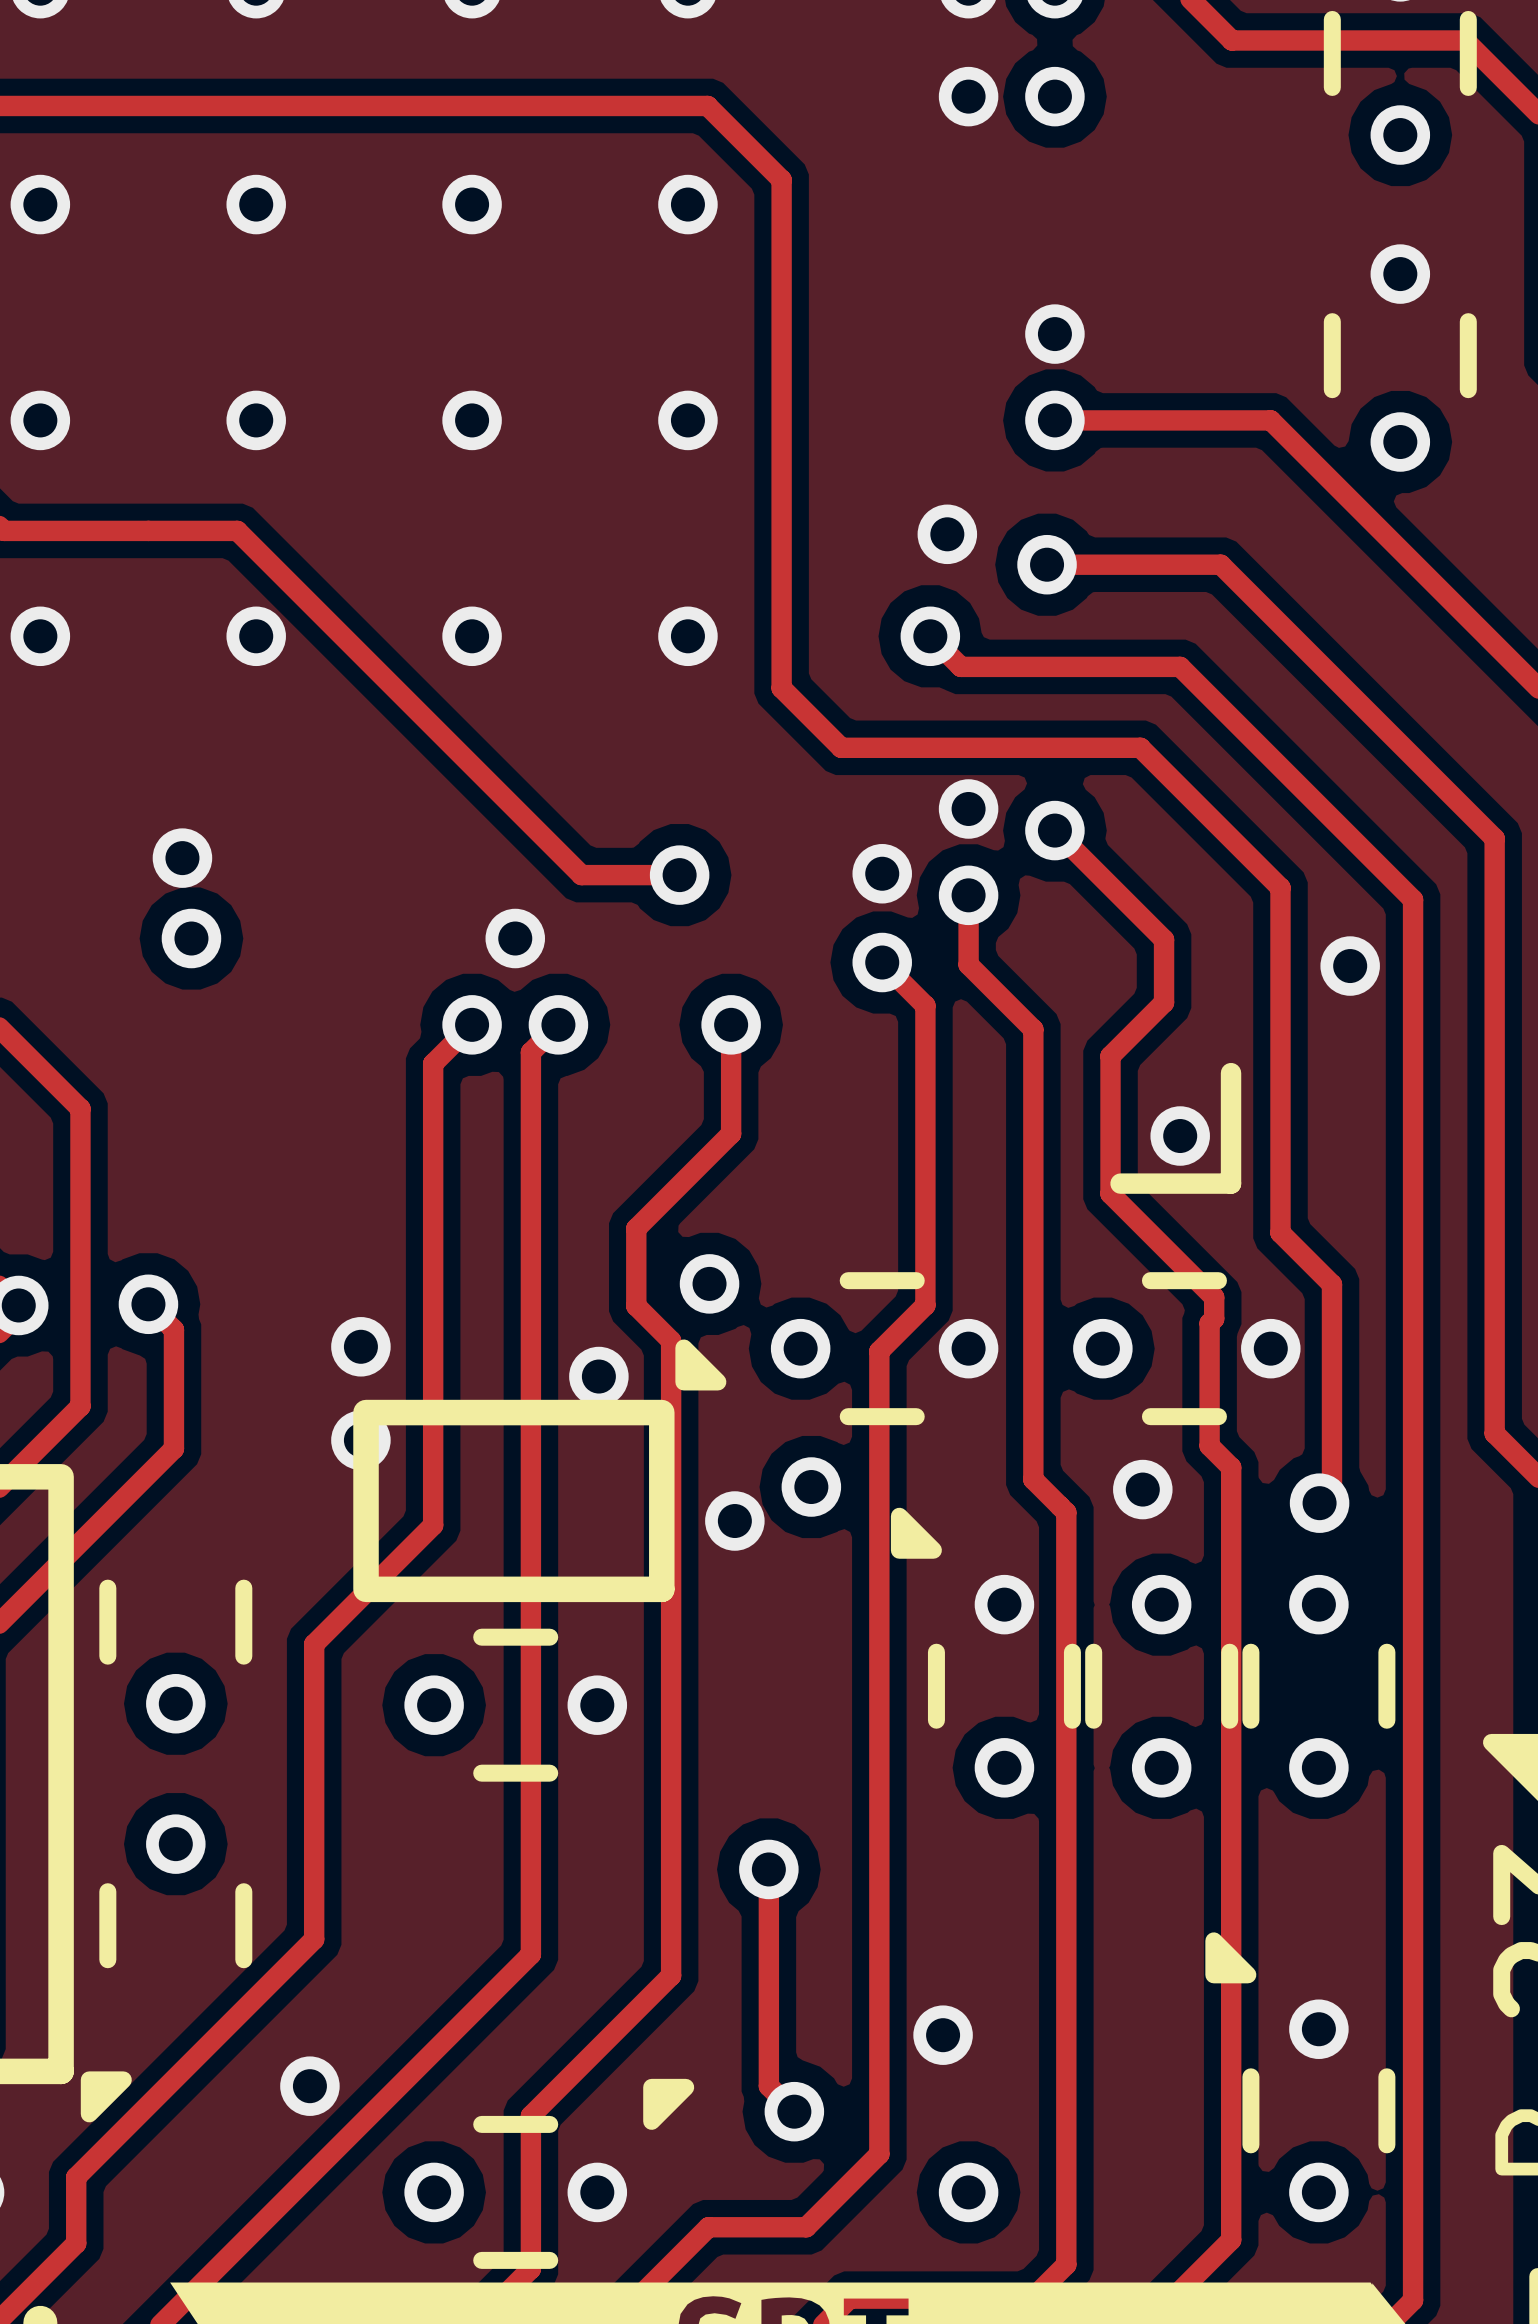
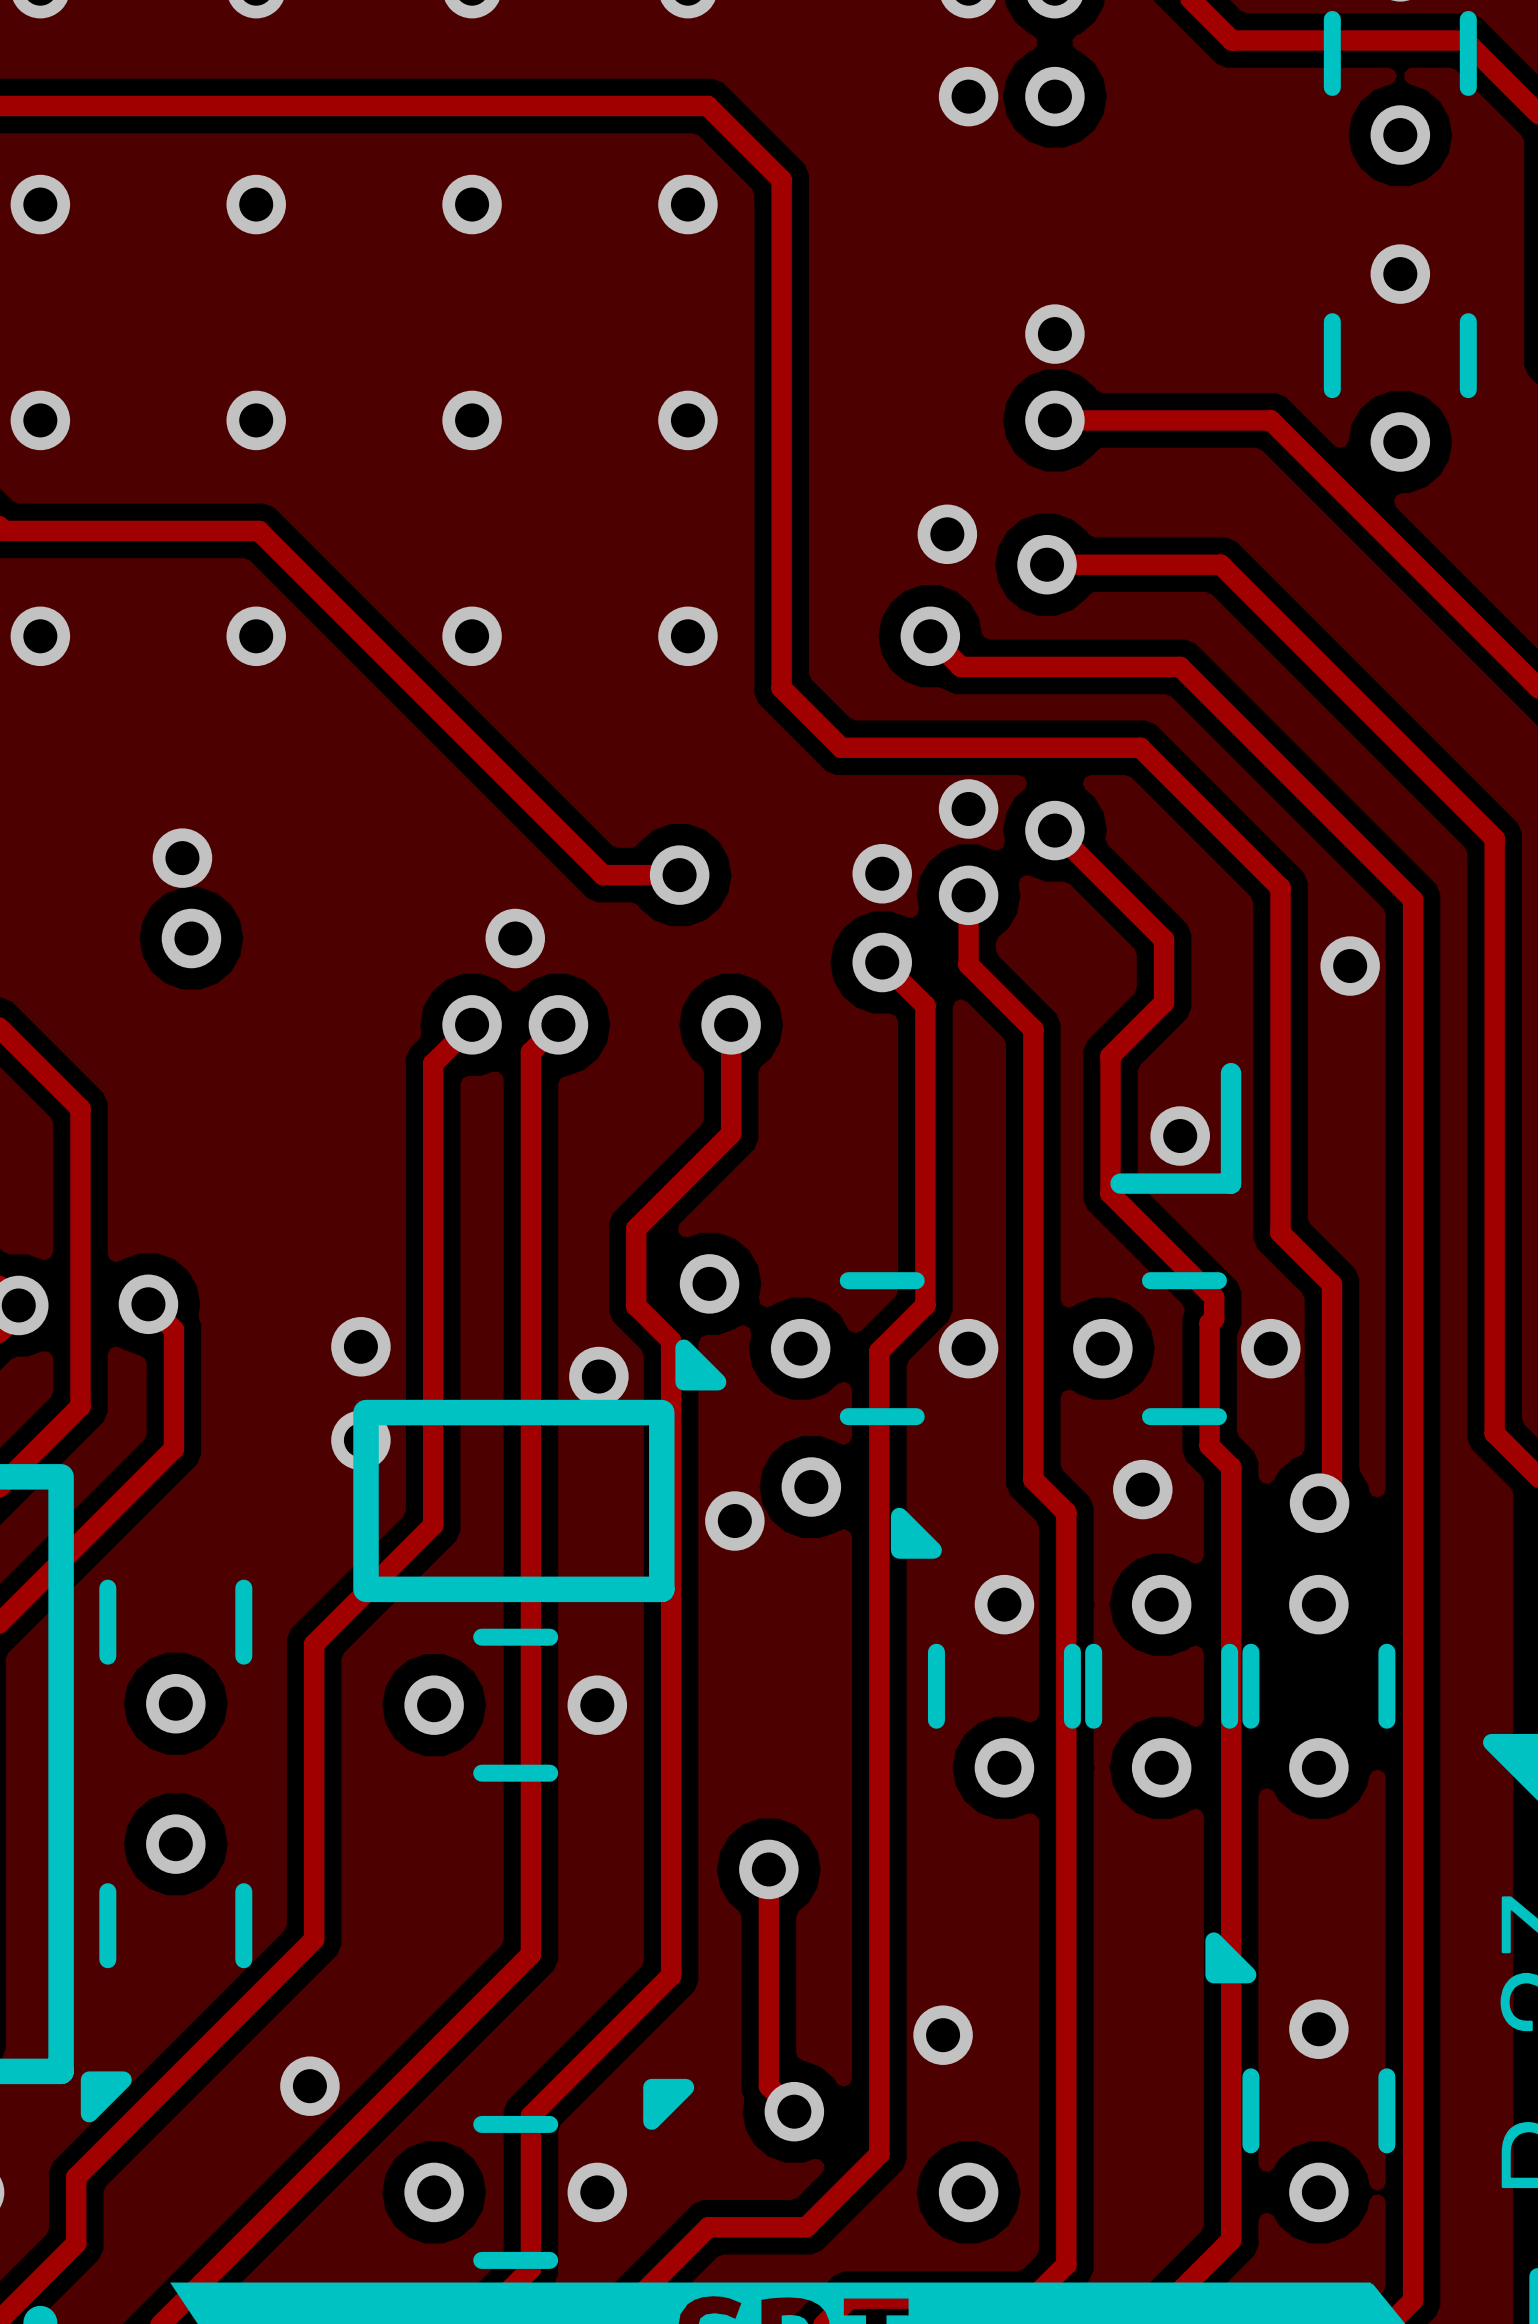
track: (237, 530) (581, 875) (603, 875) -> (237, 530) (258, 530) (603, 875)

